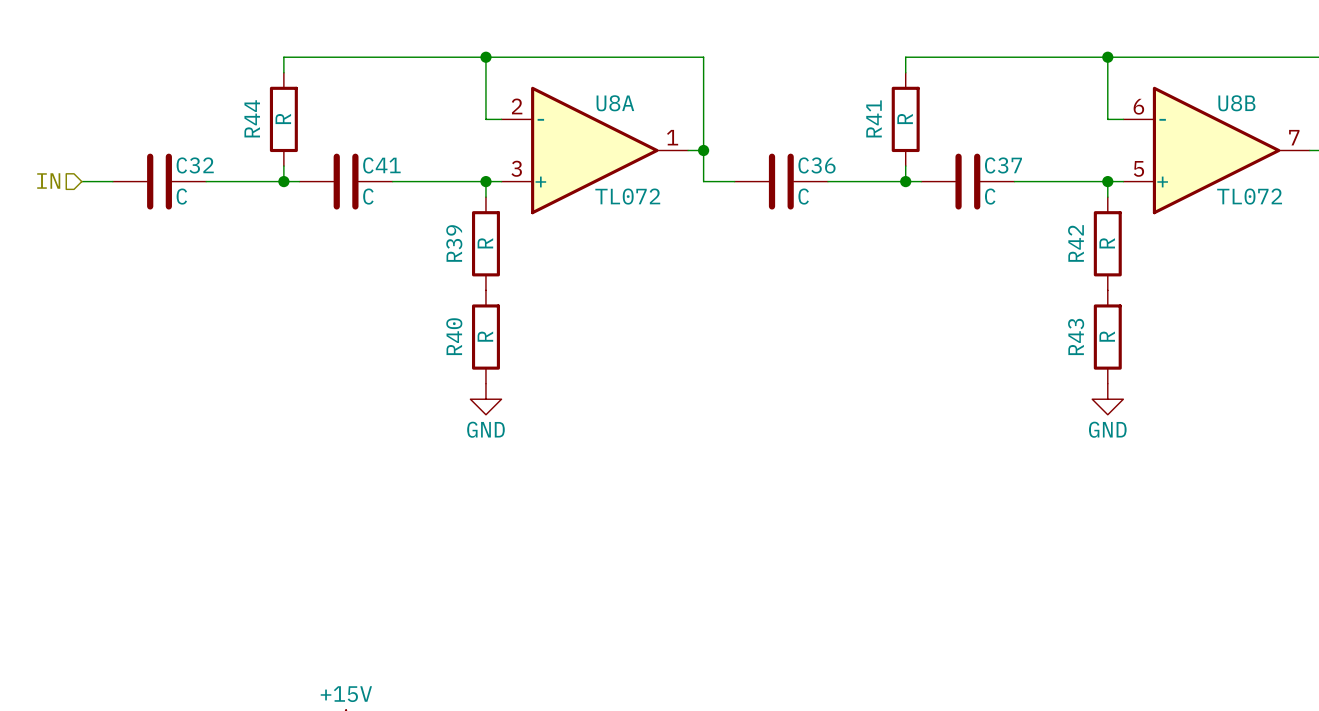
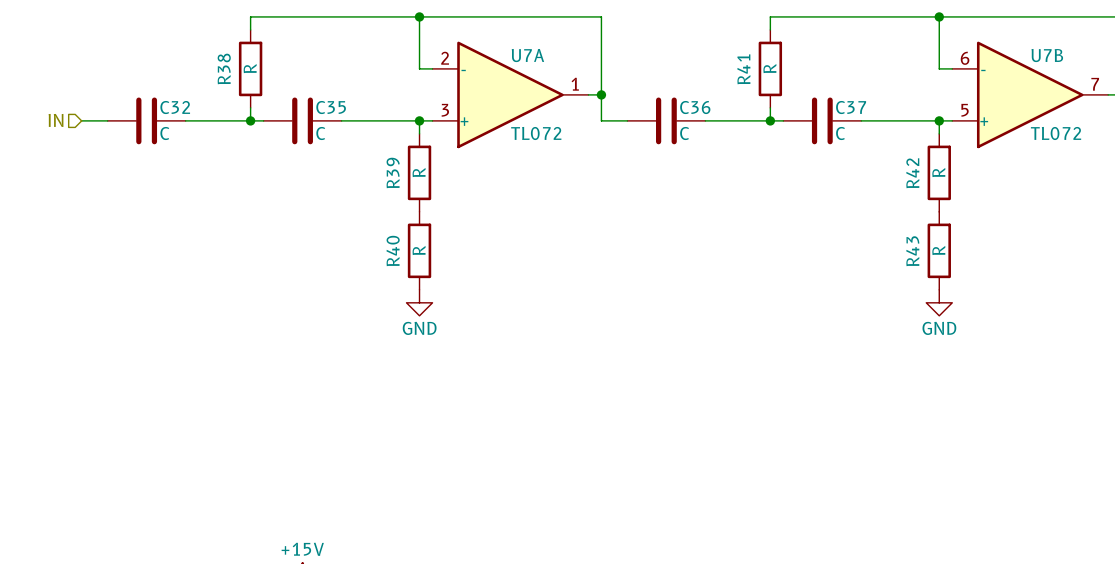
U8A name: U8A (615, 103) -> U7A (527, 55)
U8B name: U8B (1236, 103) -> U7B (1047, 55)
R44 name: R44 (252, 118) -> R38 (224, 68)
C41 name: C41 (381, 165) -> C35 (331, 107)

